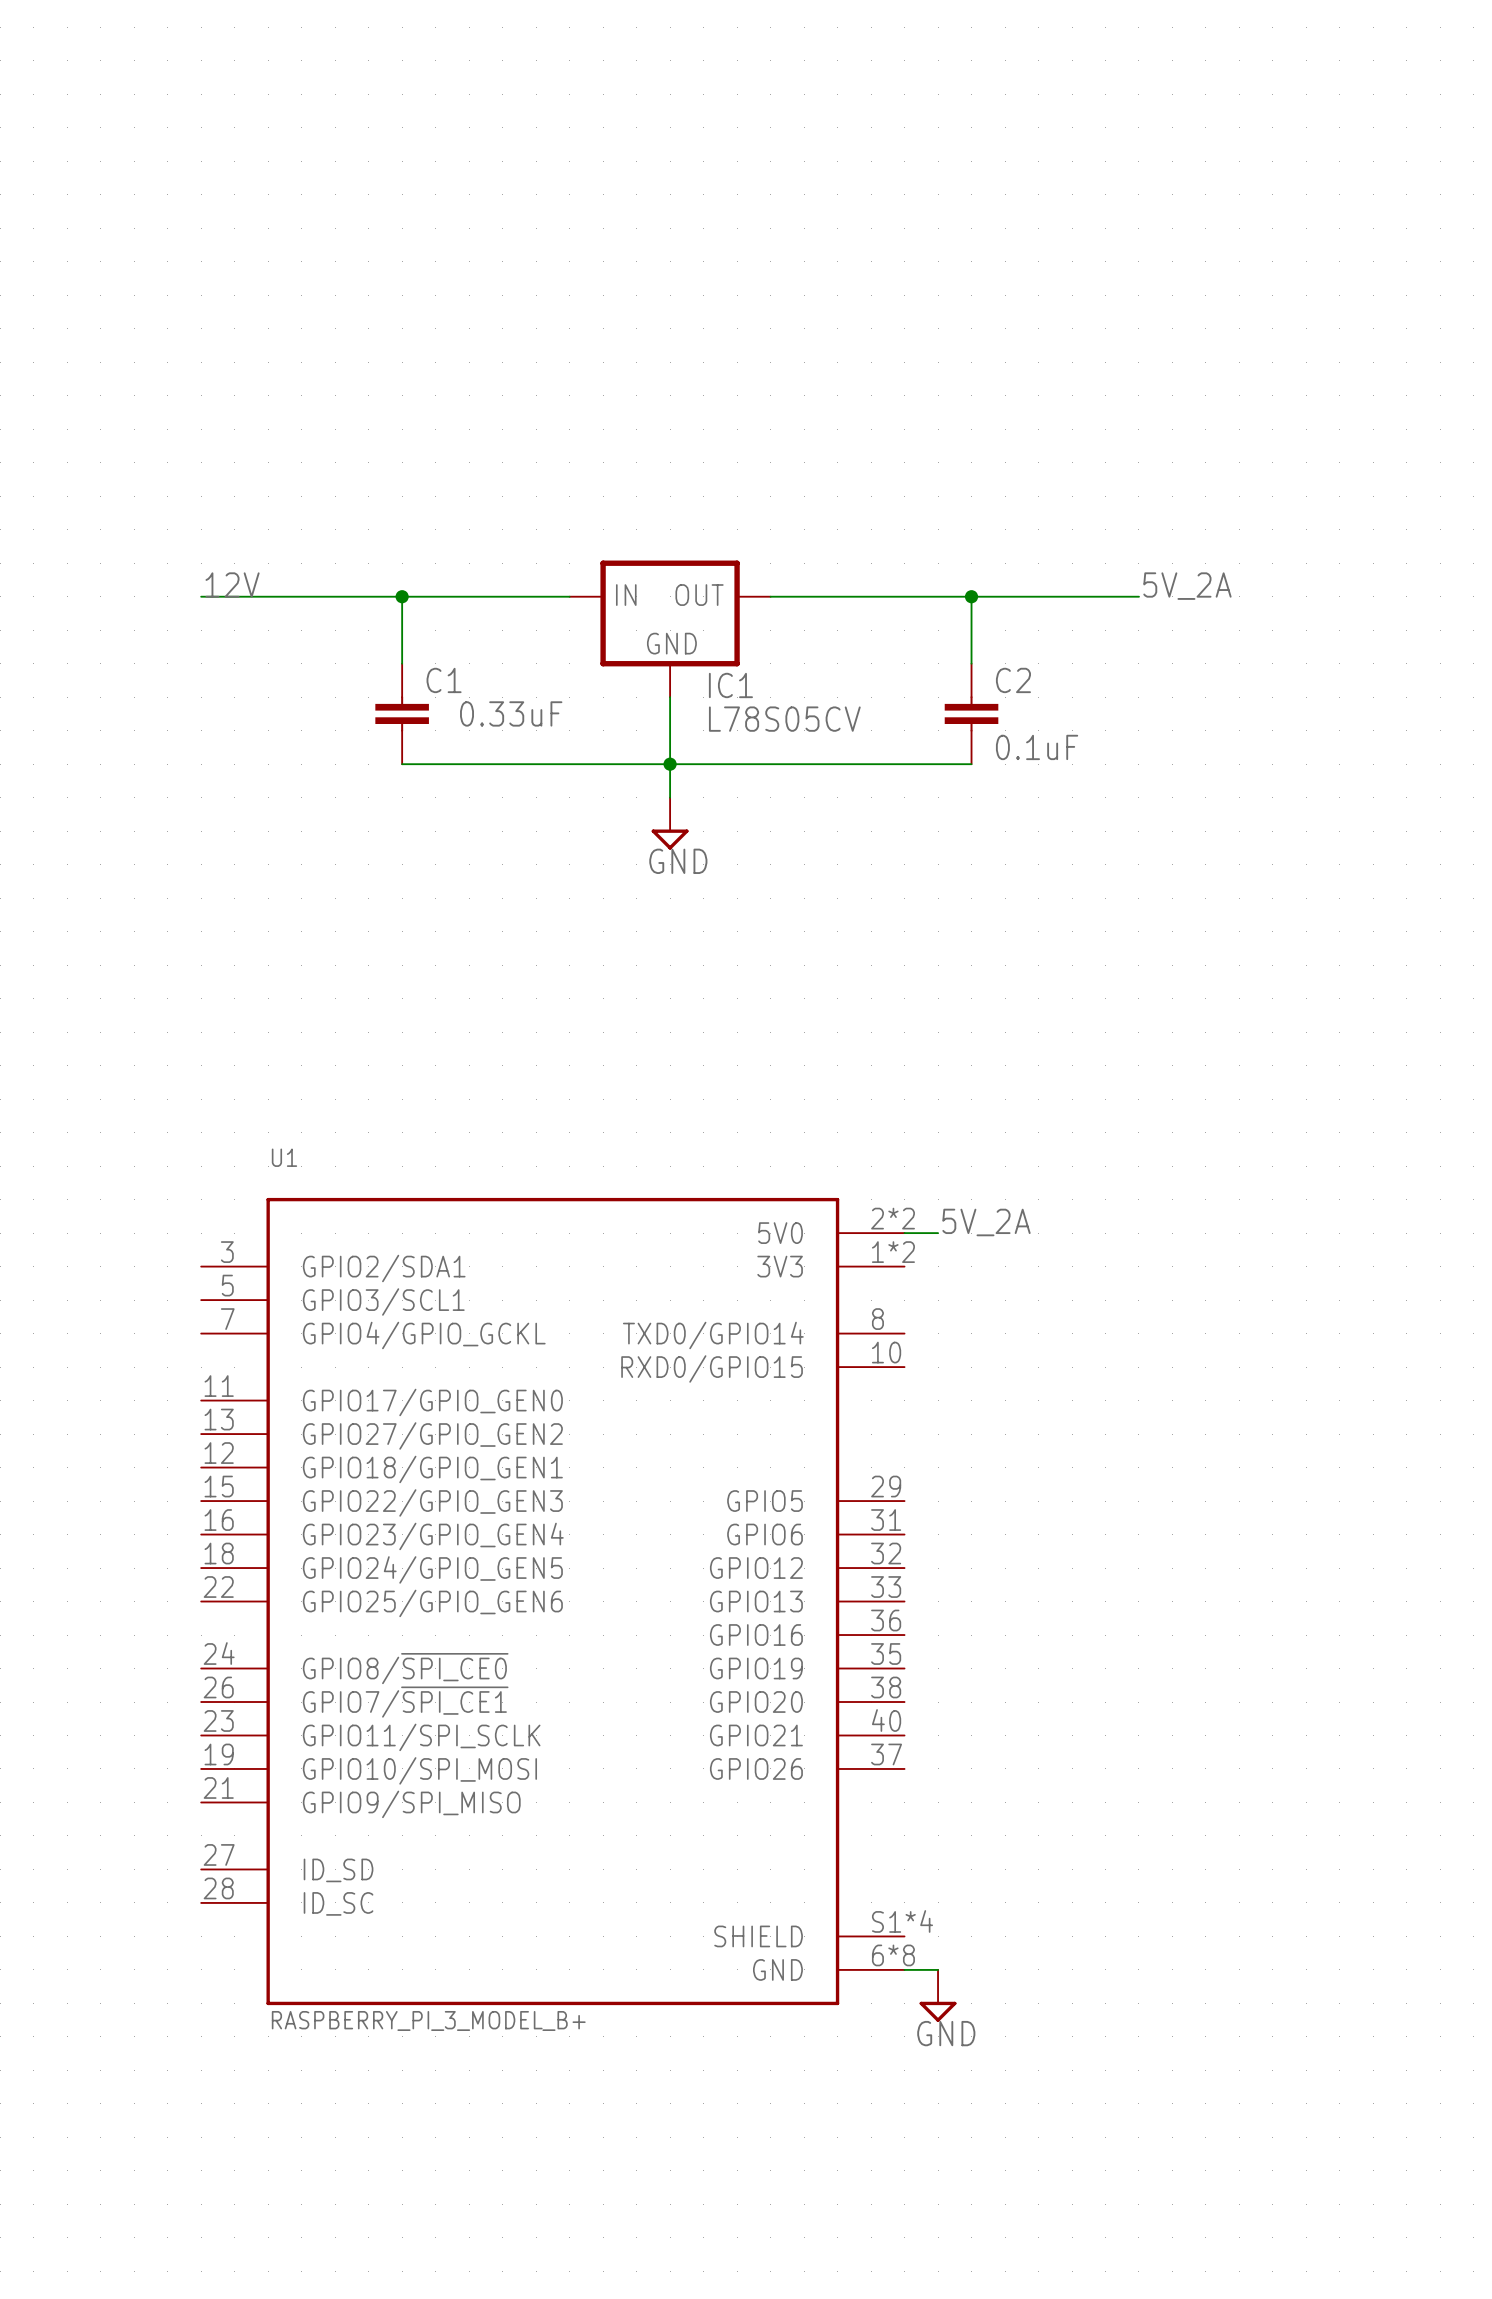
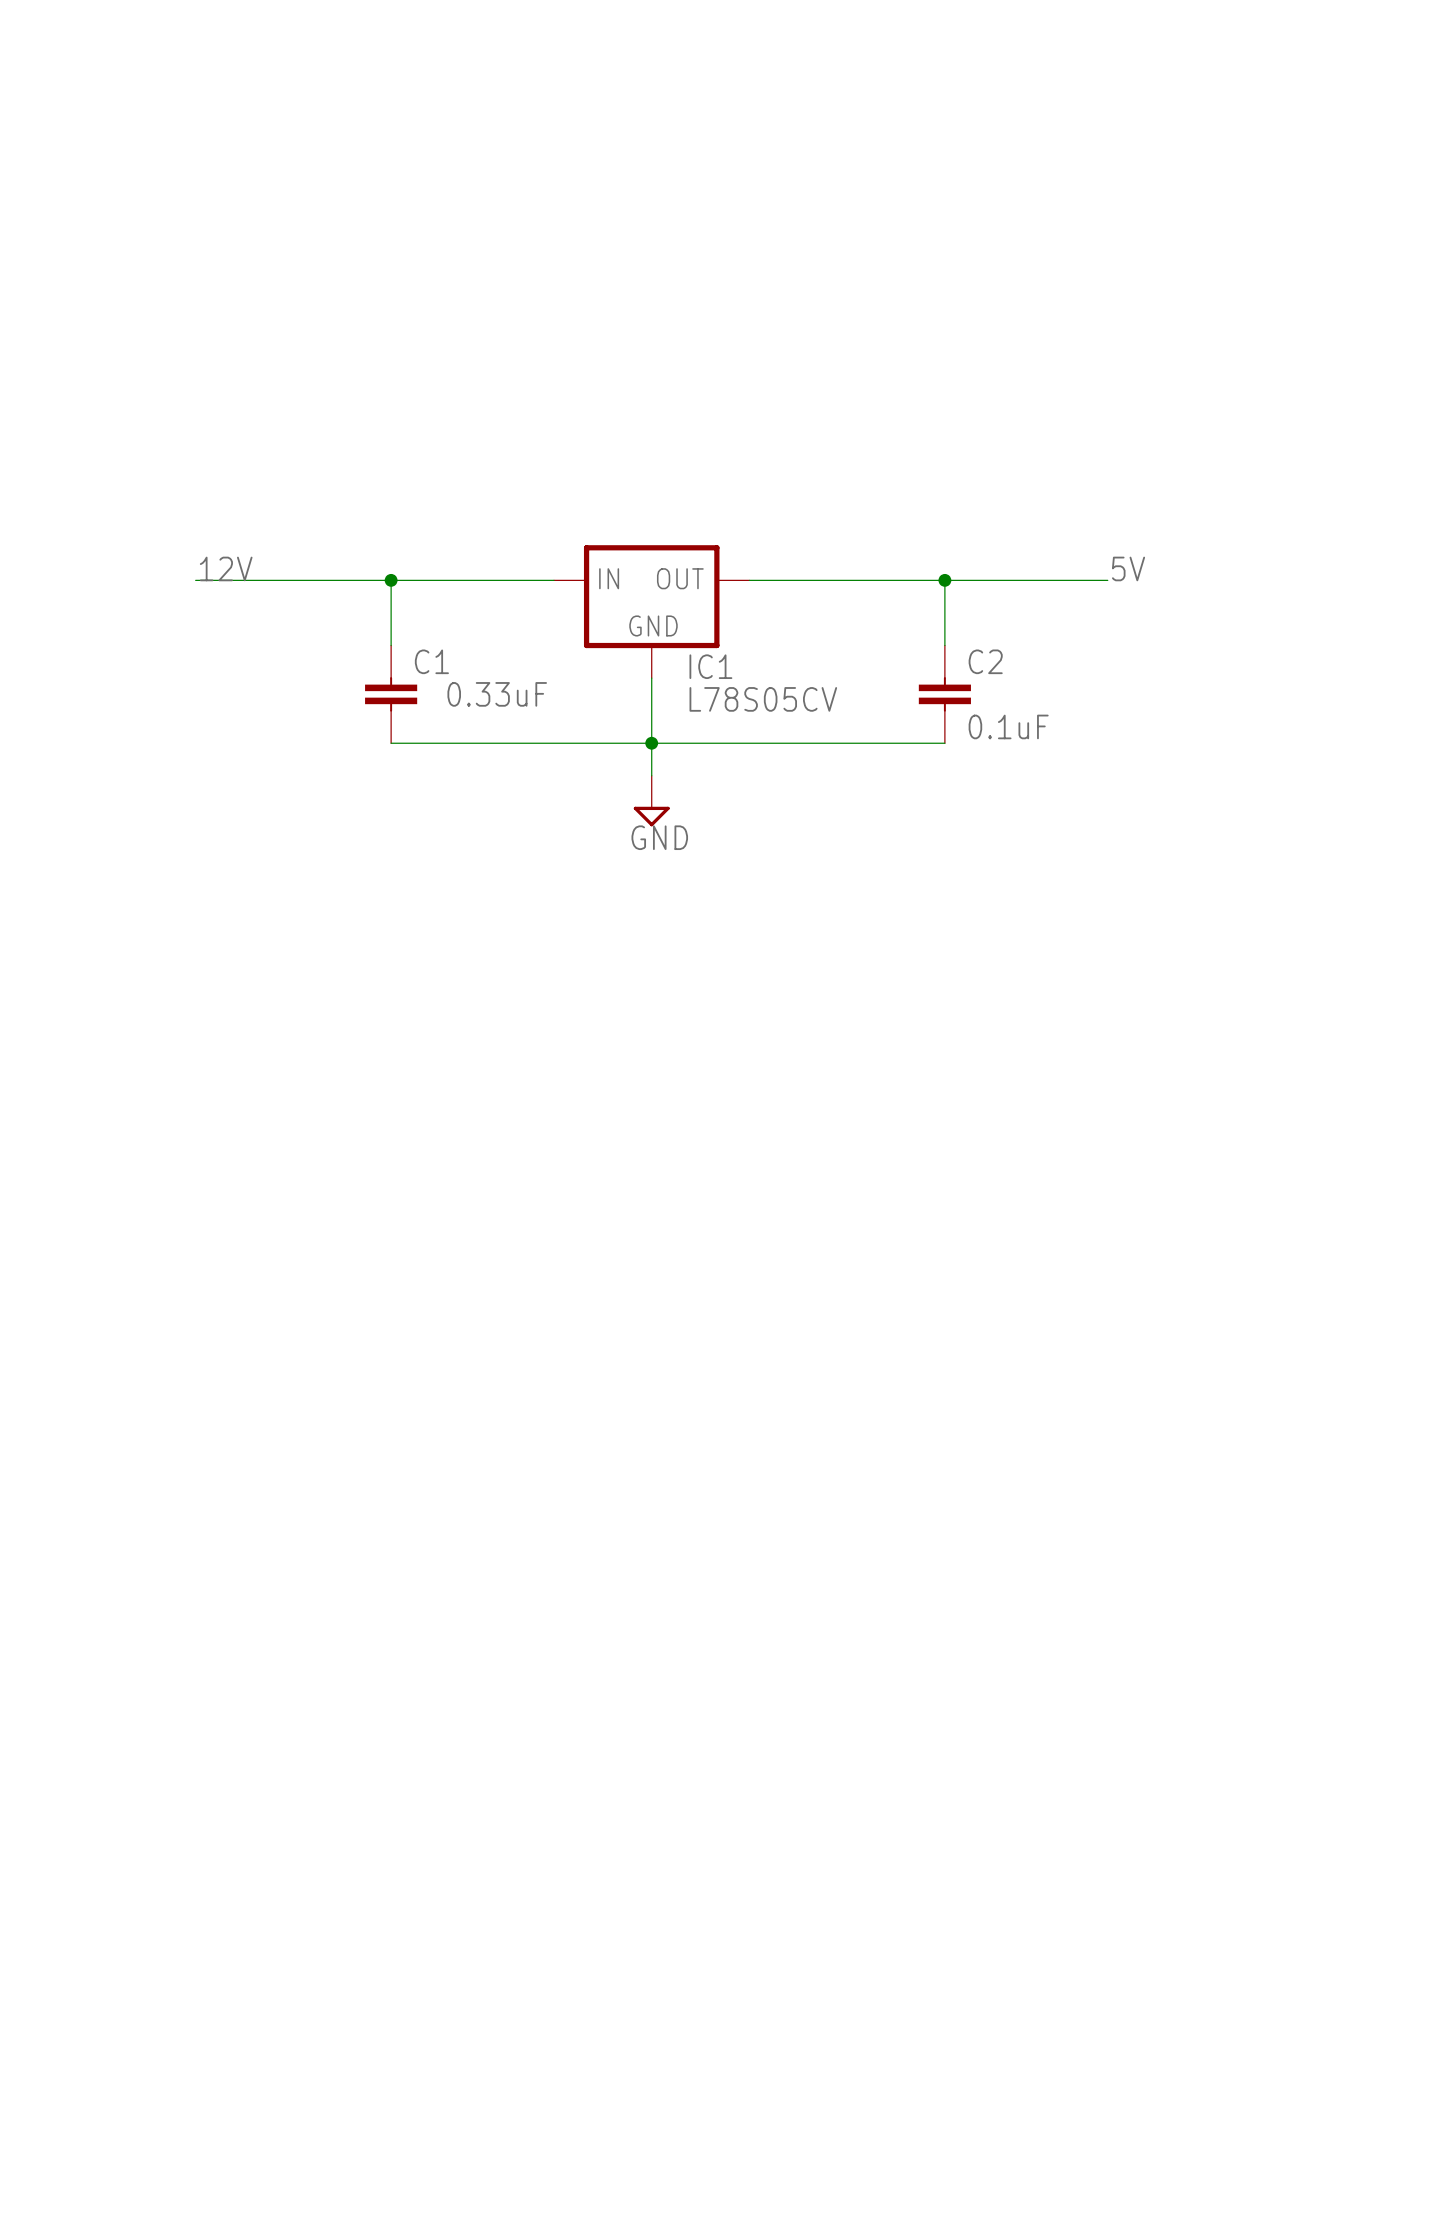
label: 5V_2A (1187, 586) -> 5V (1128, 568)
label: 5V_2A (986, 1222) -> none
wire: (904, 1233) (938, 1233) -> none
U1: RASPBERRY_PI_3_MODEL_B+ (552, 1601) -> none
wire: (904, 1969) (938, 1969) -> none
power symbol: GND (938, 1995) -> none

